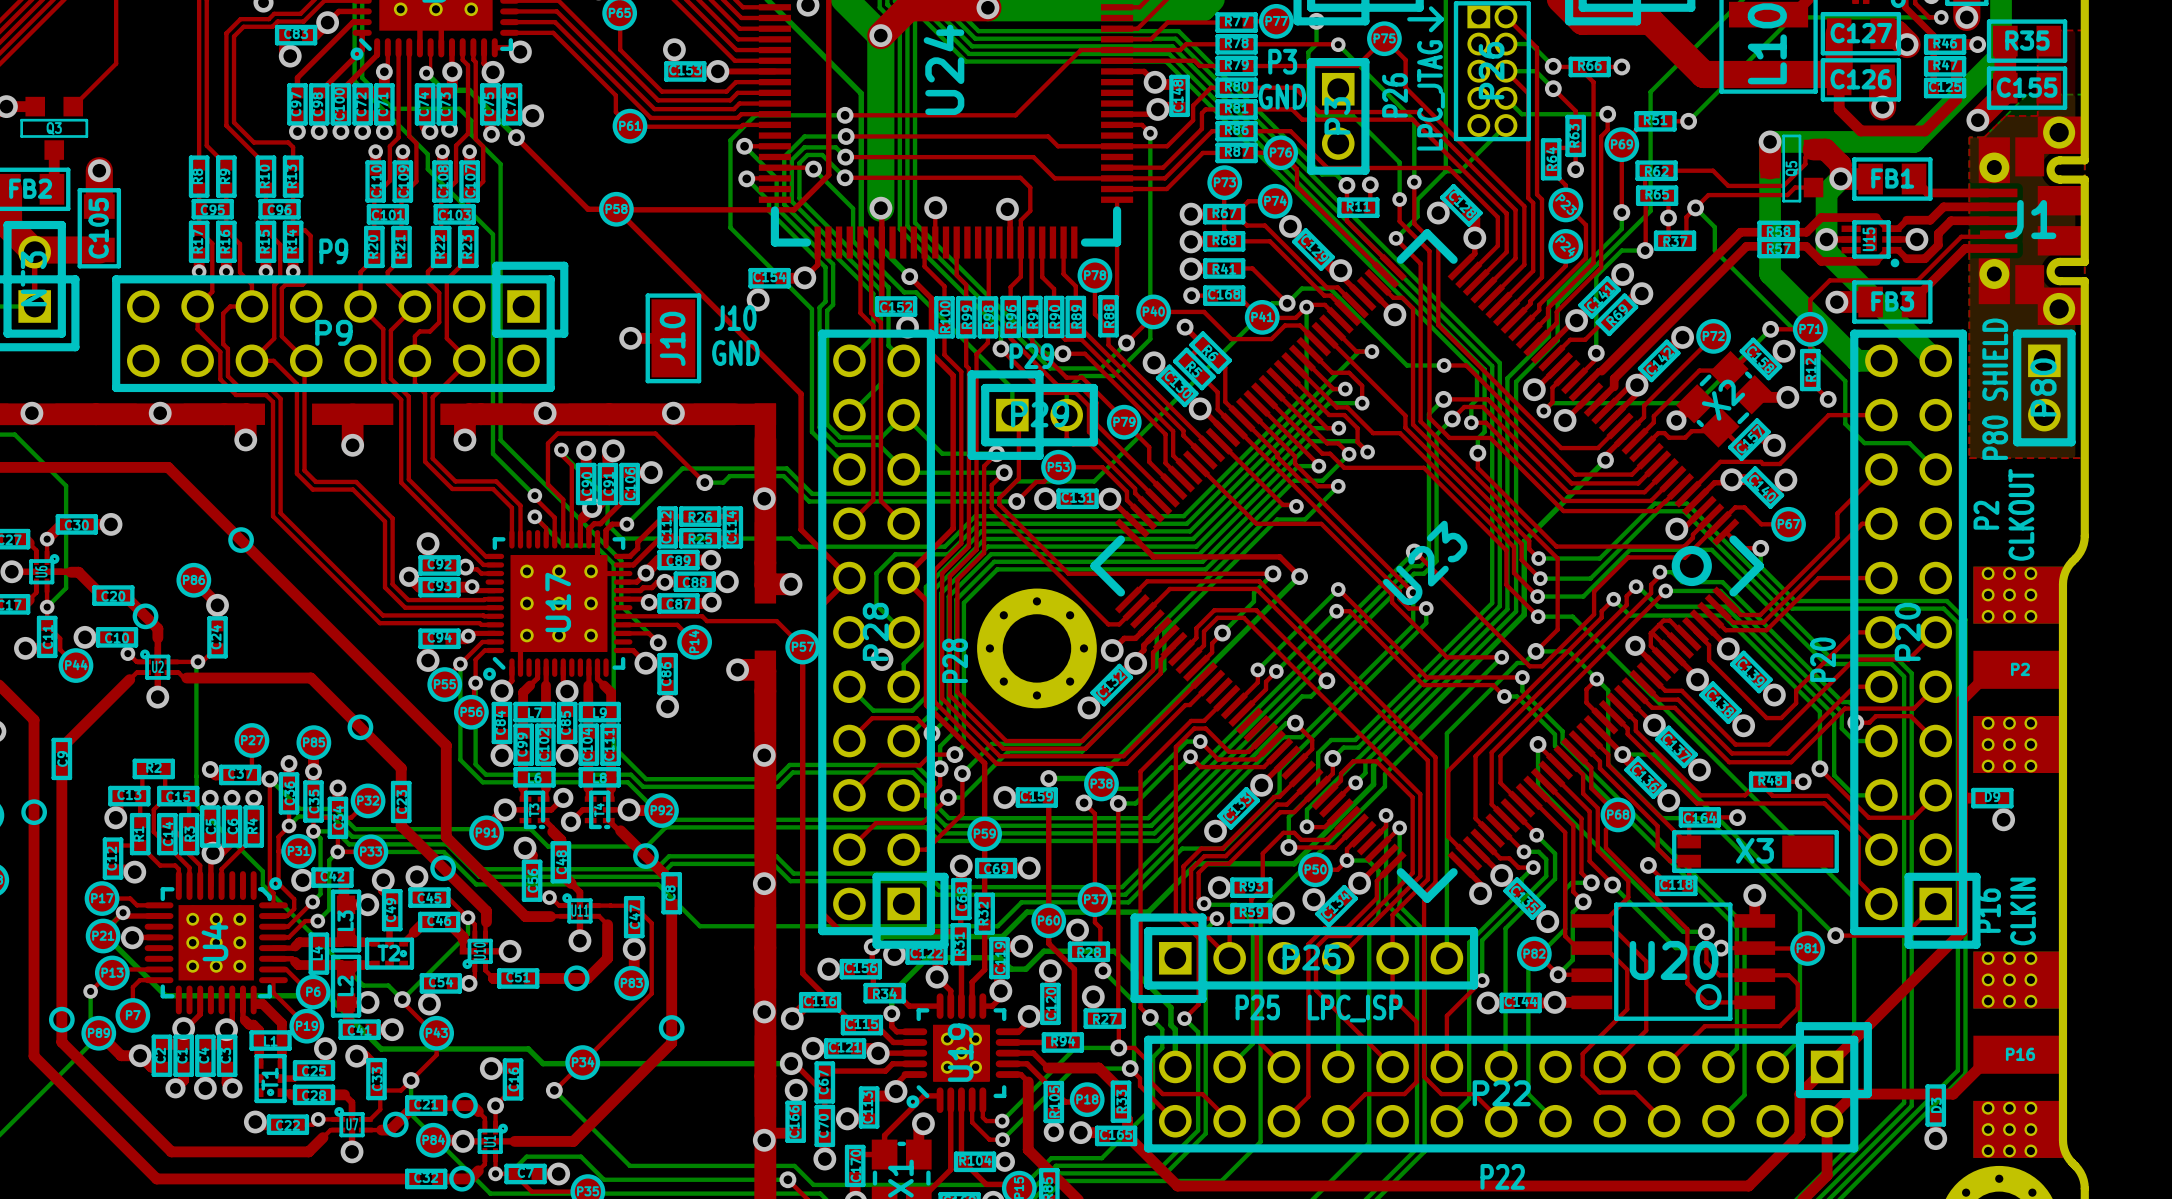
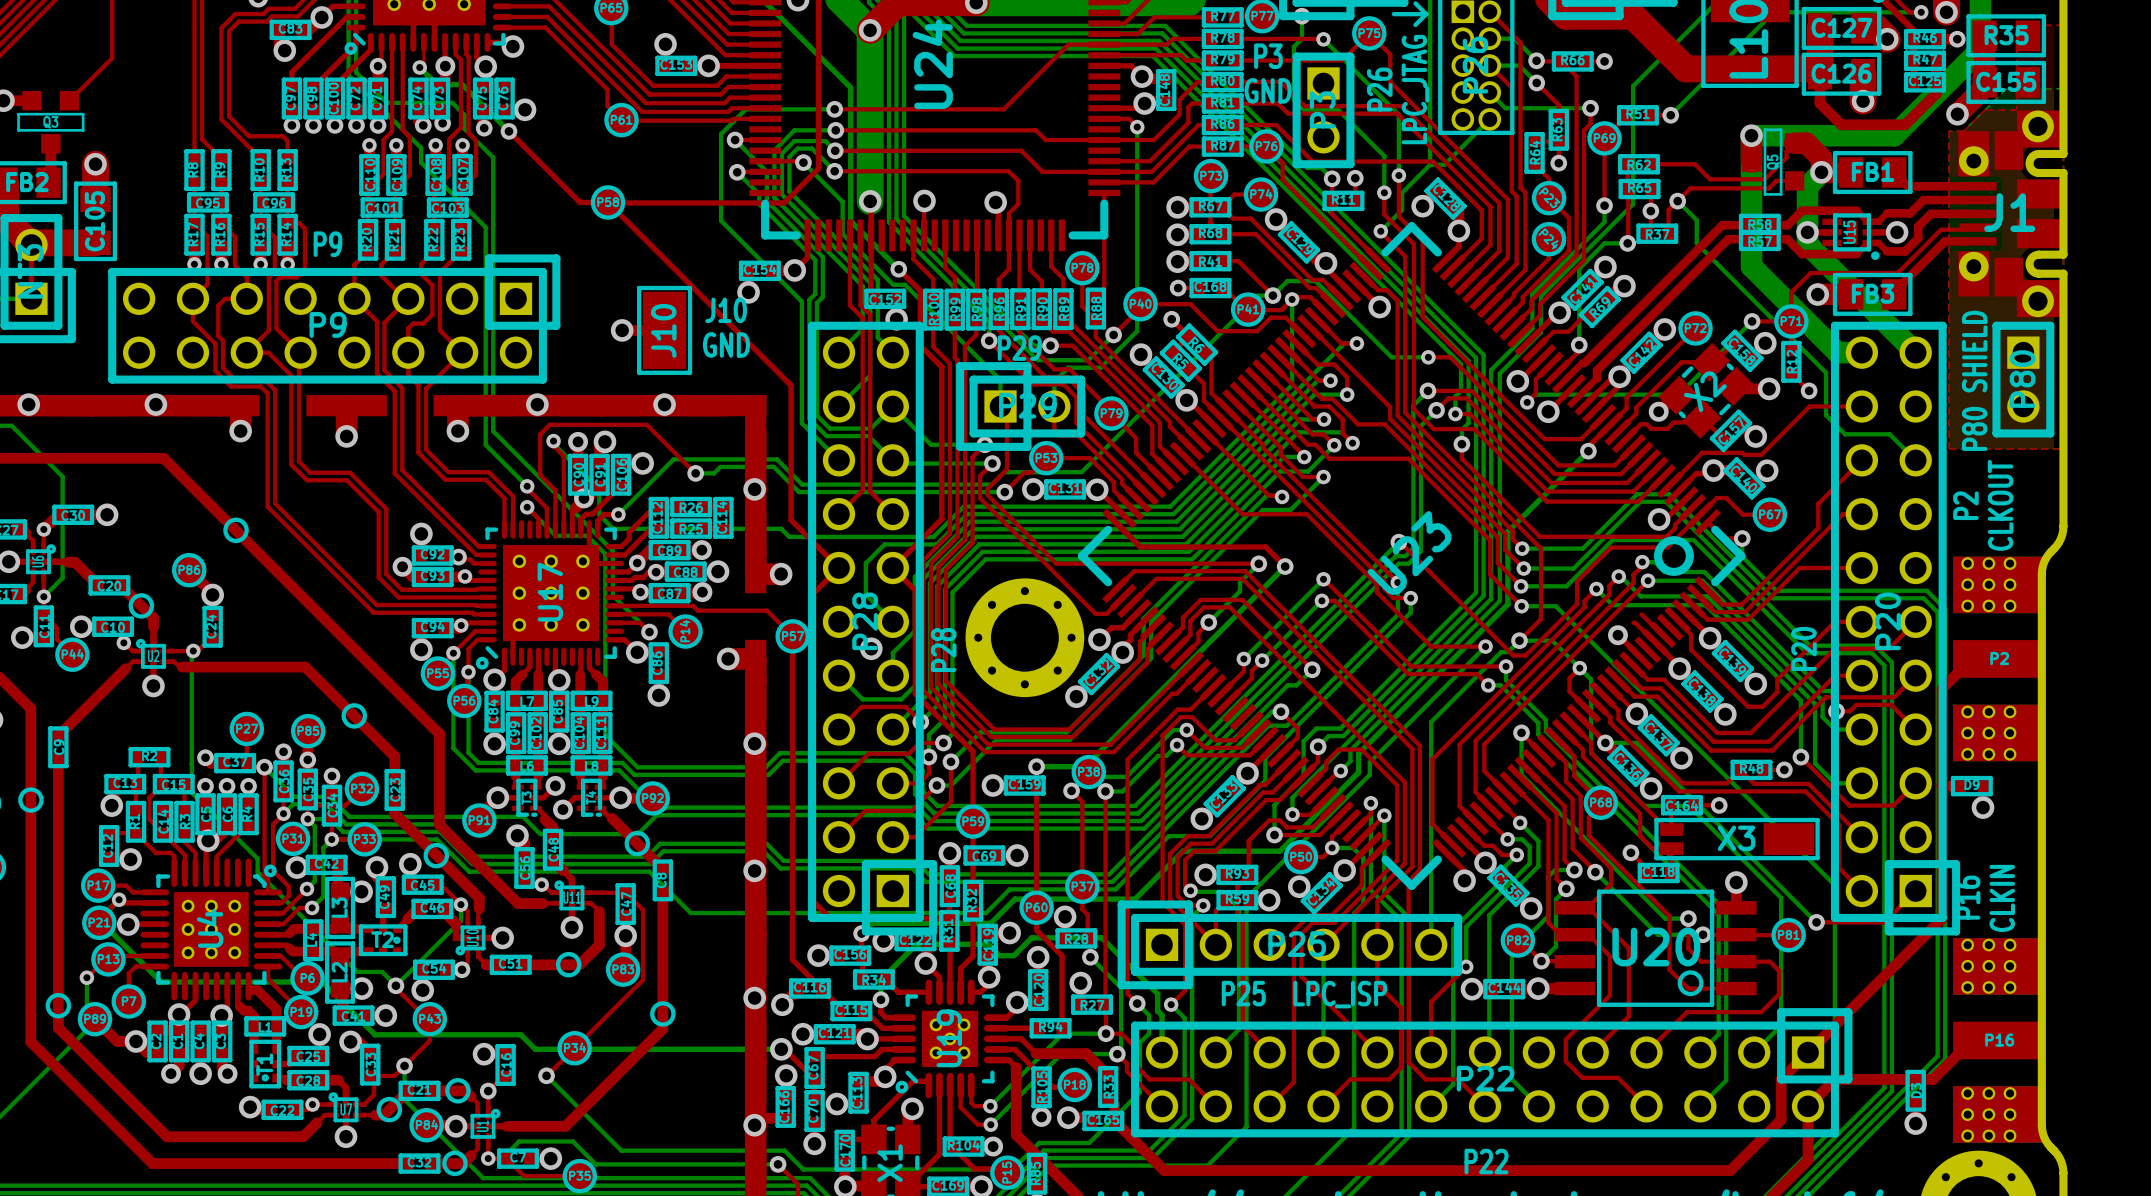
top track: (1688, 637) (1669, 620) (1663, 620) (1650, 633) (1650, 645) (1665, 660) -> none

